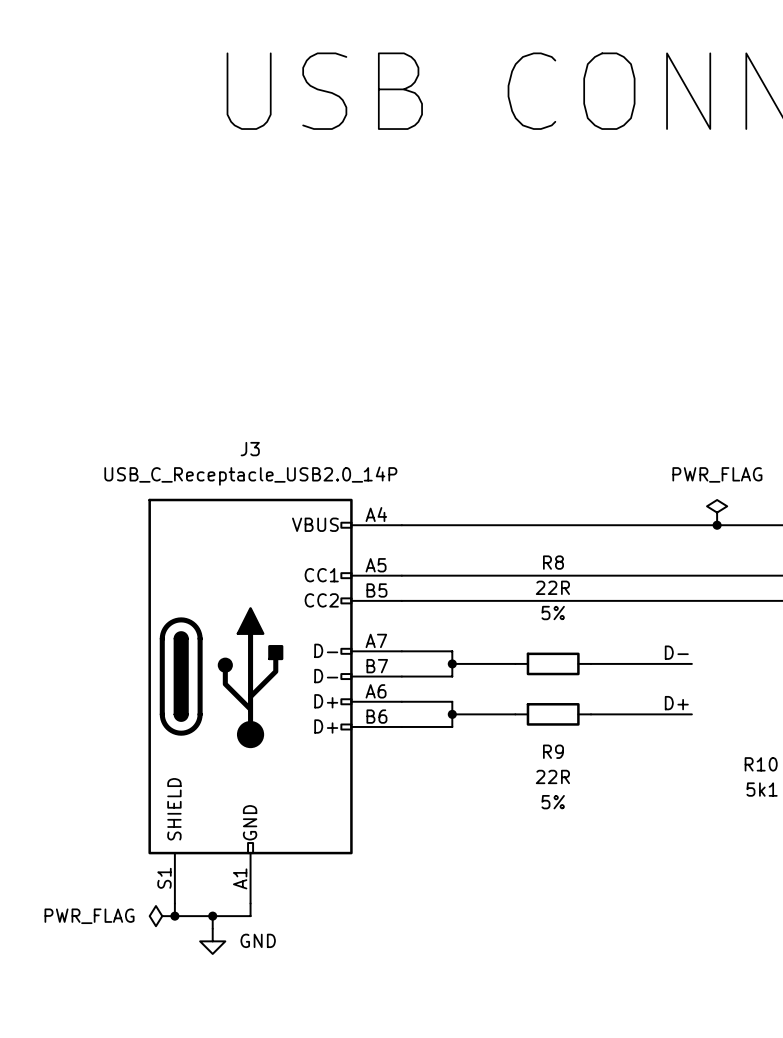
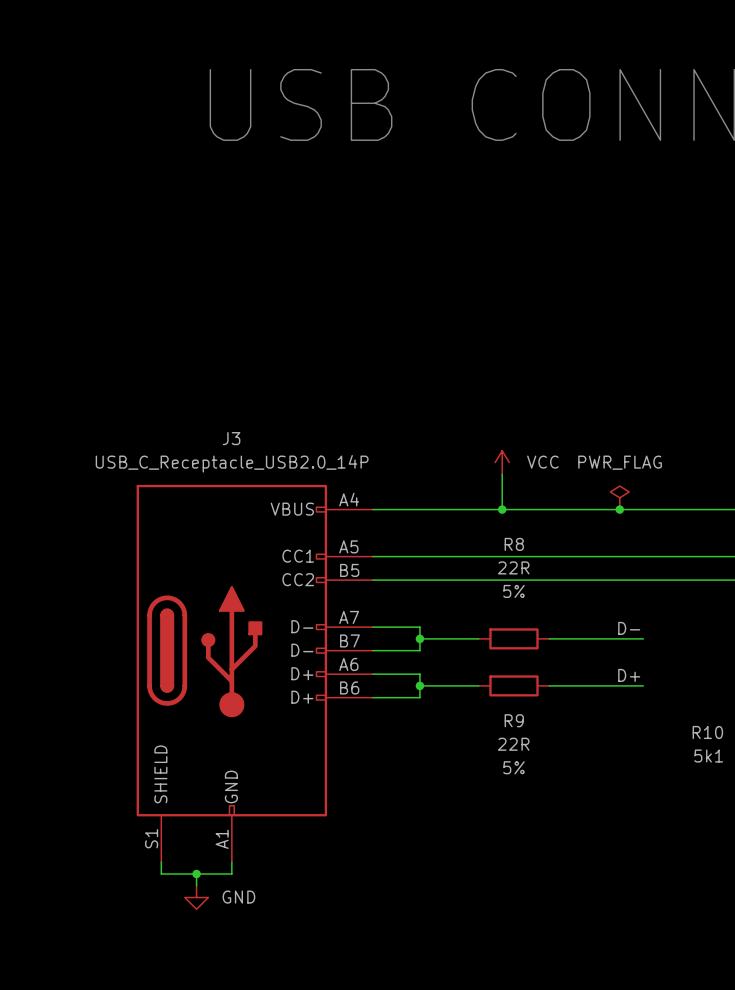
power symbol: none -> VCC (502, 462)
wire: none -> (502, 474) (502, 509)
power symbol position: PWR_FLAG (717, 512) -> PWR_FLAG (619, 497)
junction: none -> (502, 509)
junction position: (717, 525) -> (619, 509)
power symbol: PWR_FLAG (162, 916) -> none
junction: (174, 916) -> none

